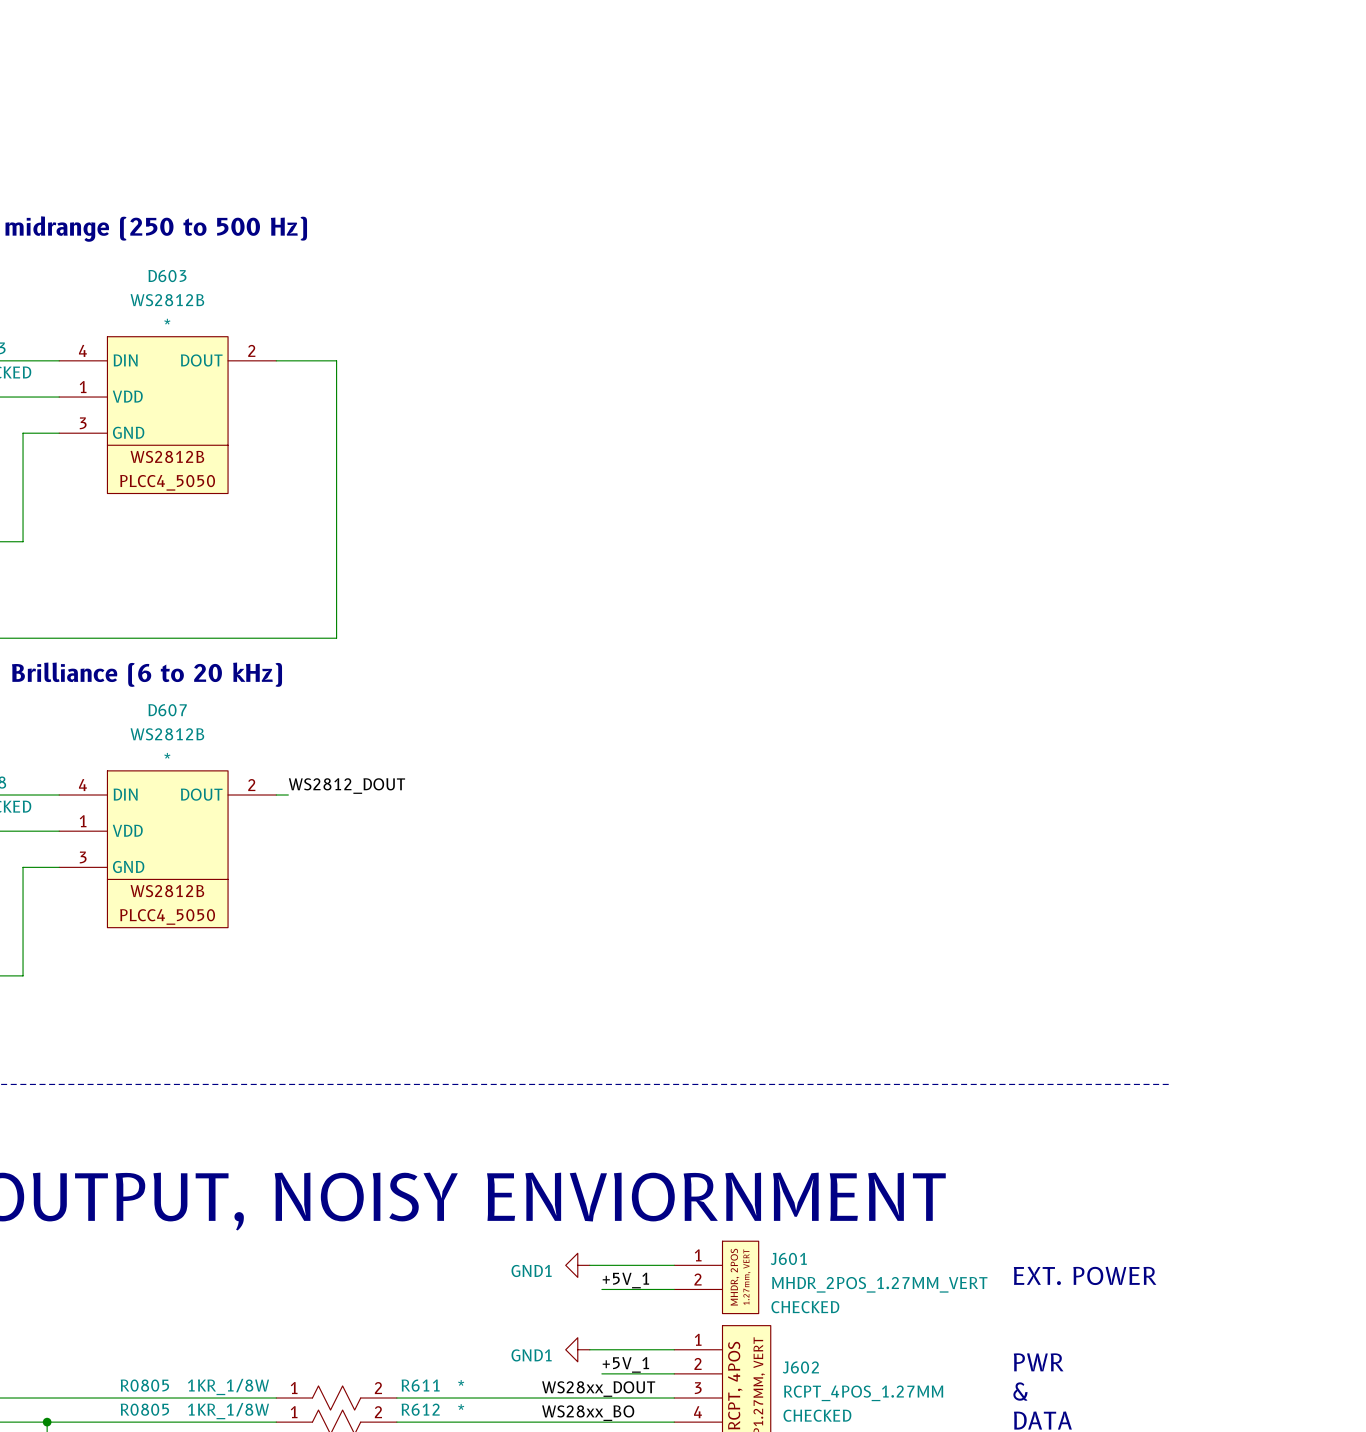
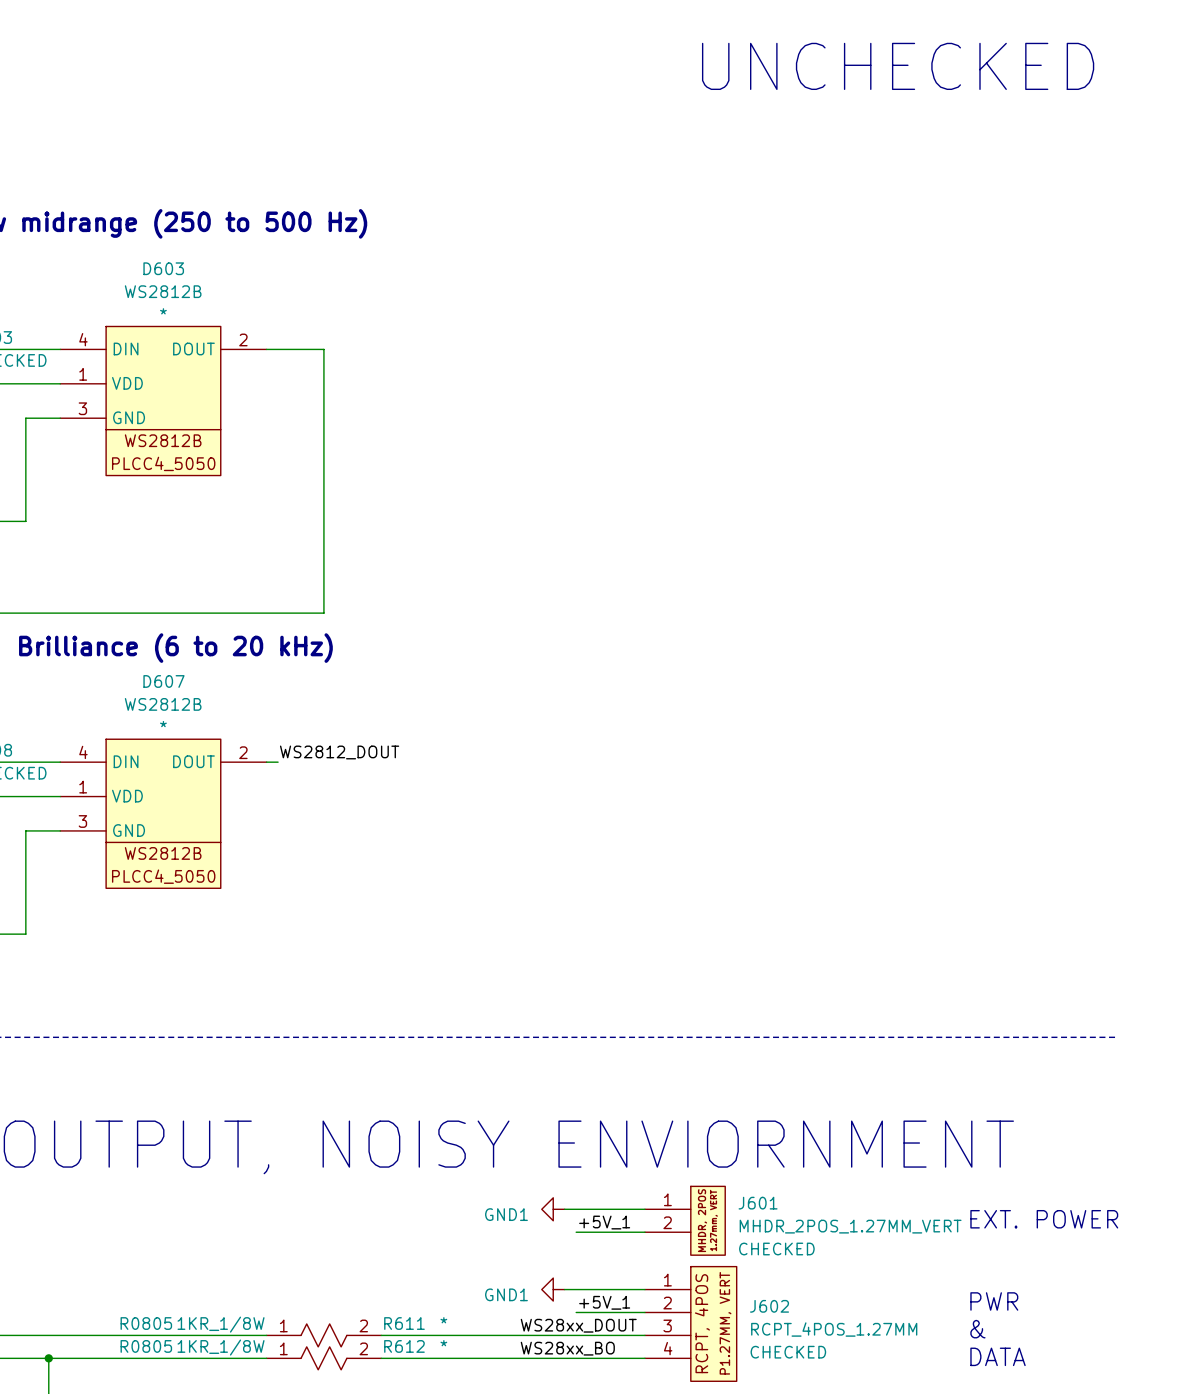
text: none -> UNCHECKED (898, 66)

